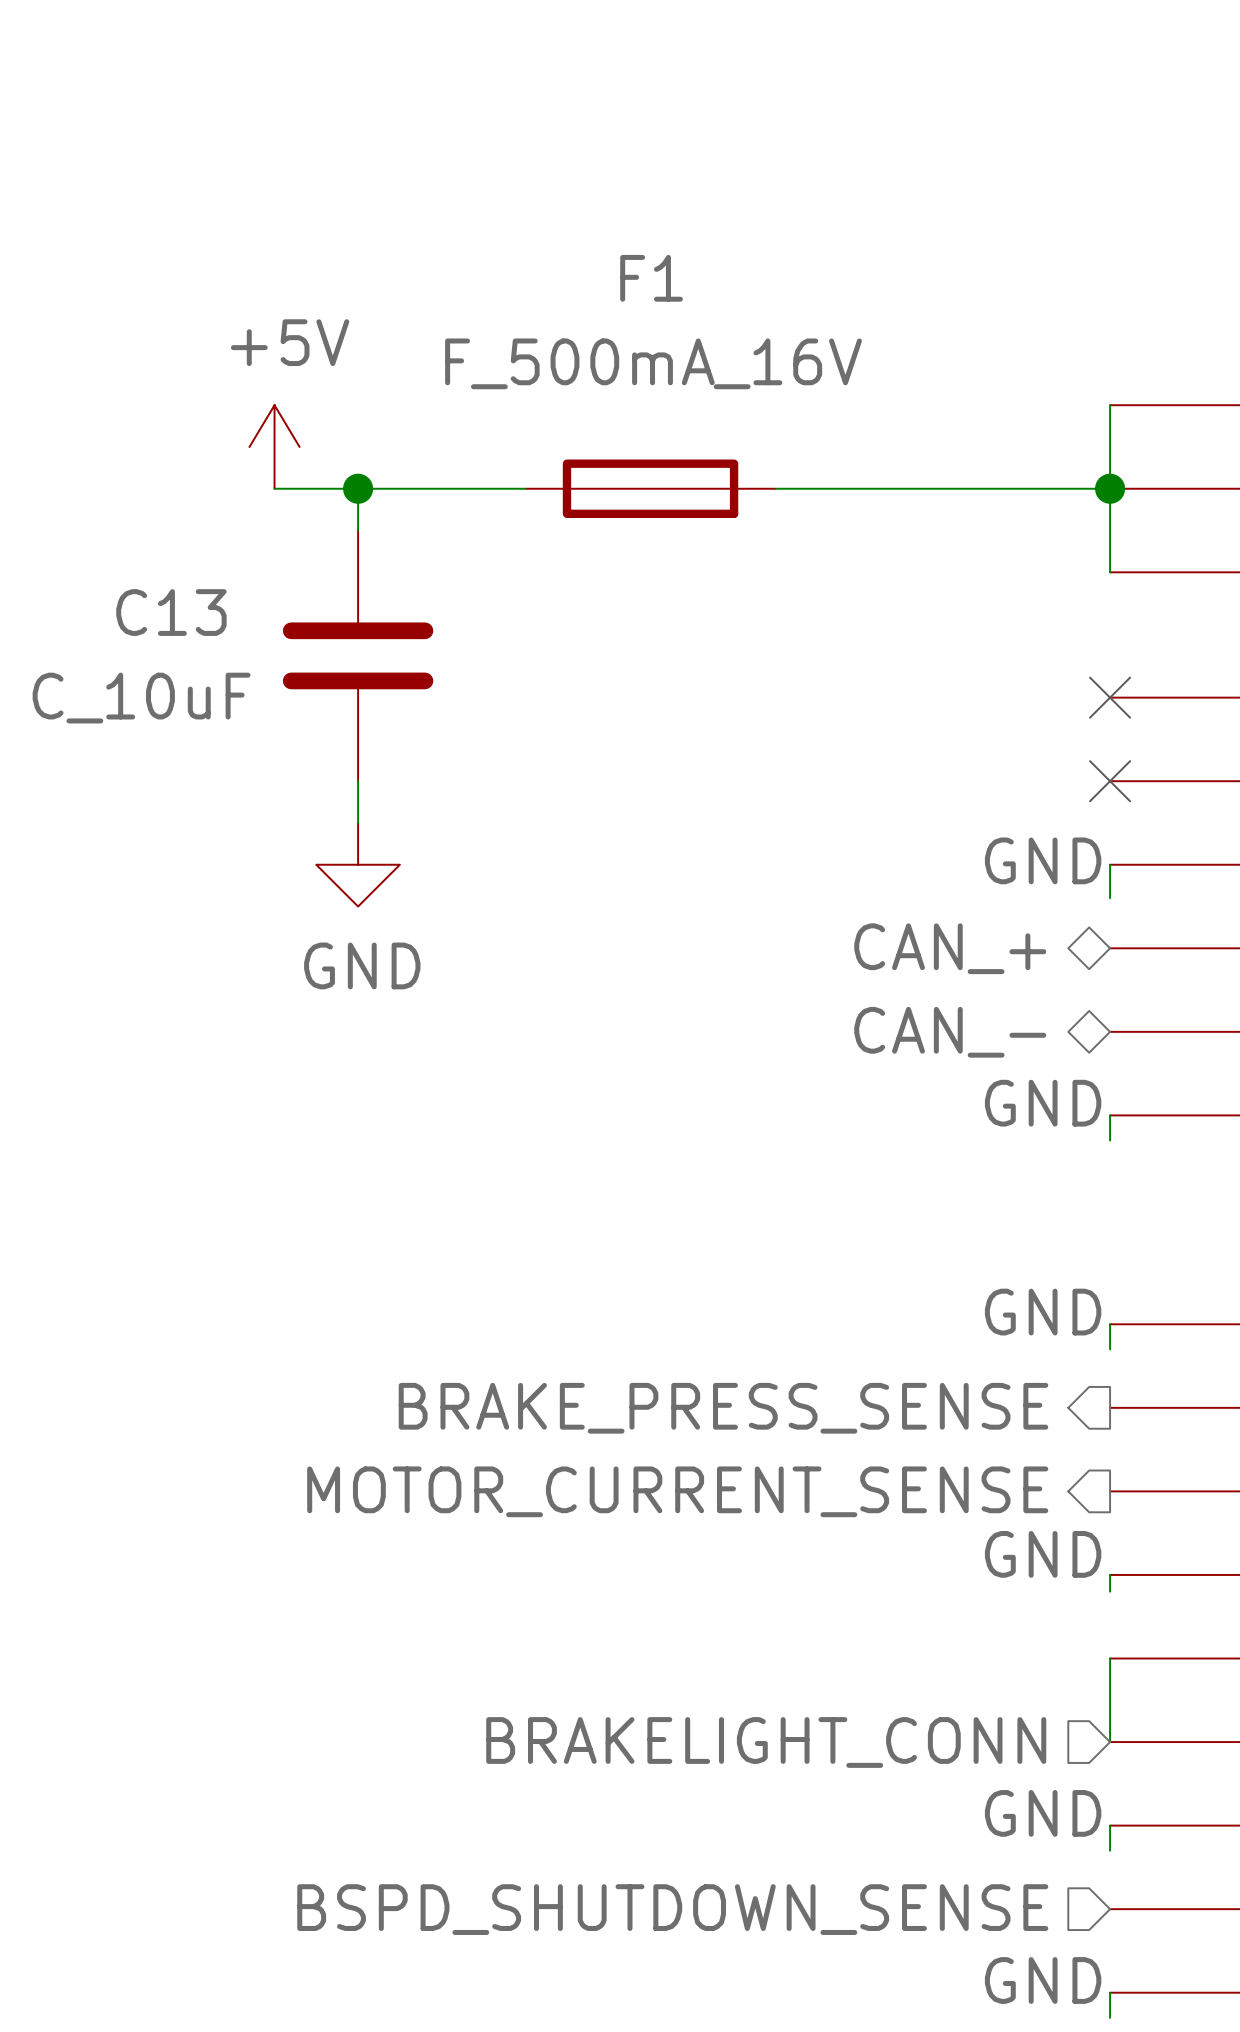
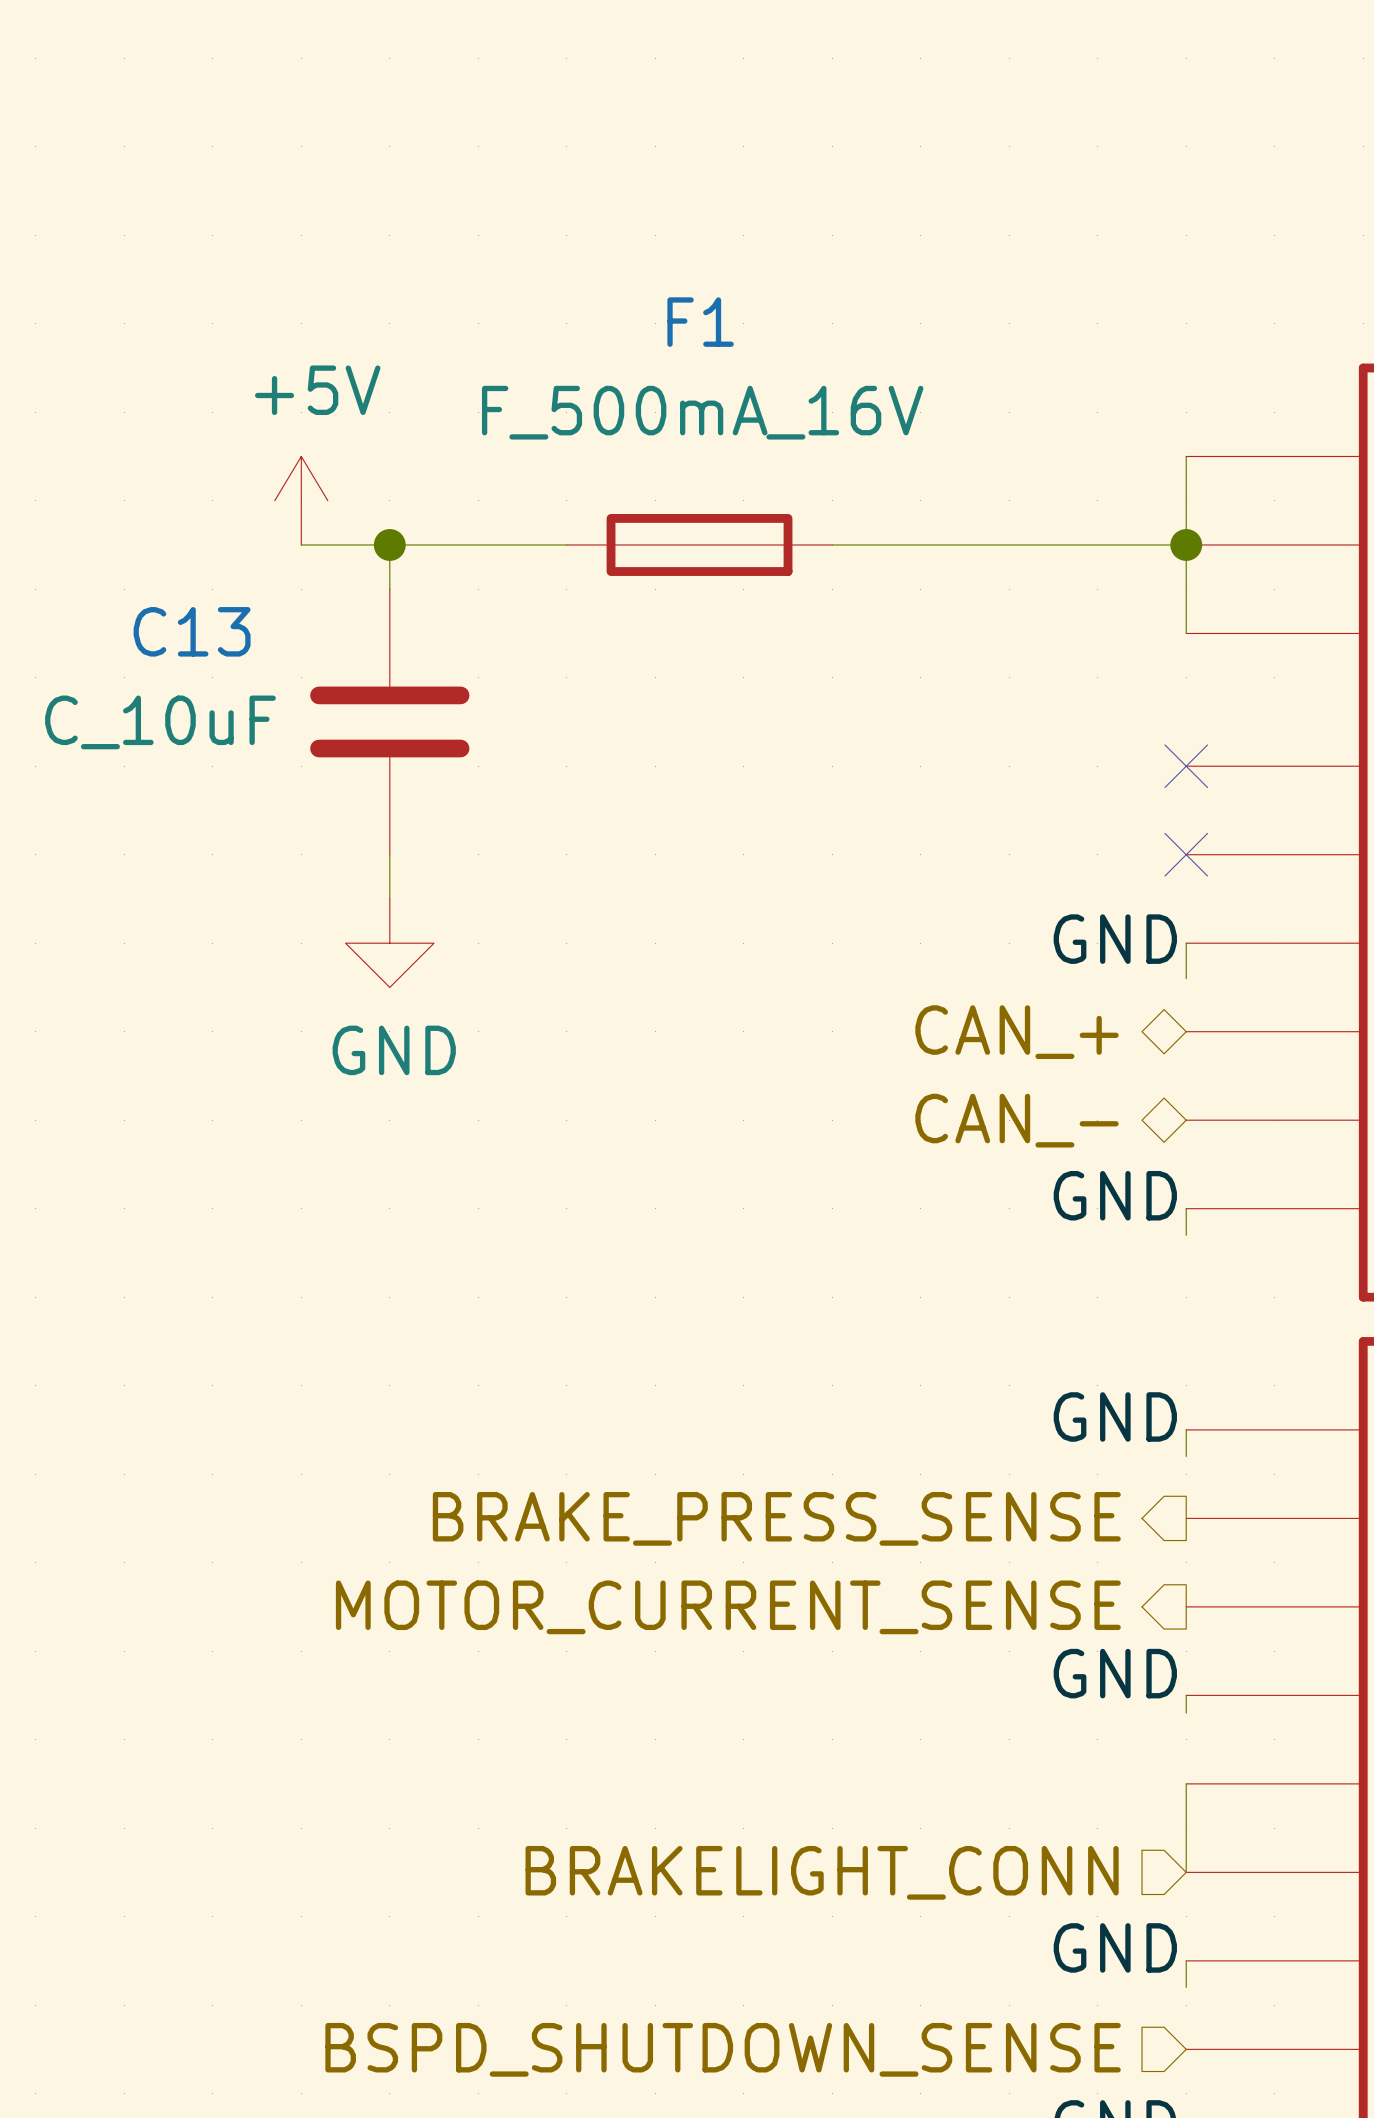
C13 name position: C13 (171, 612) -> C13 (192, 631)
C13 value position: C_10uF (141, 698) -> C_10uF (160, 722)

